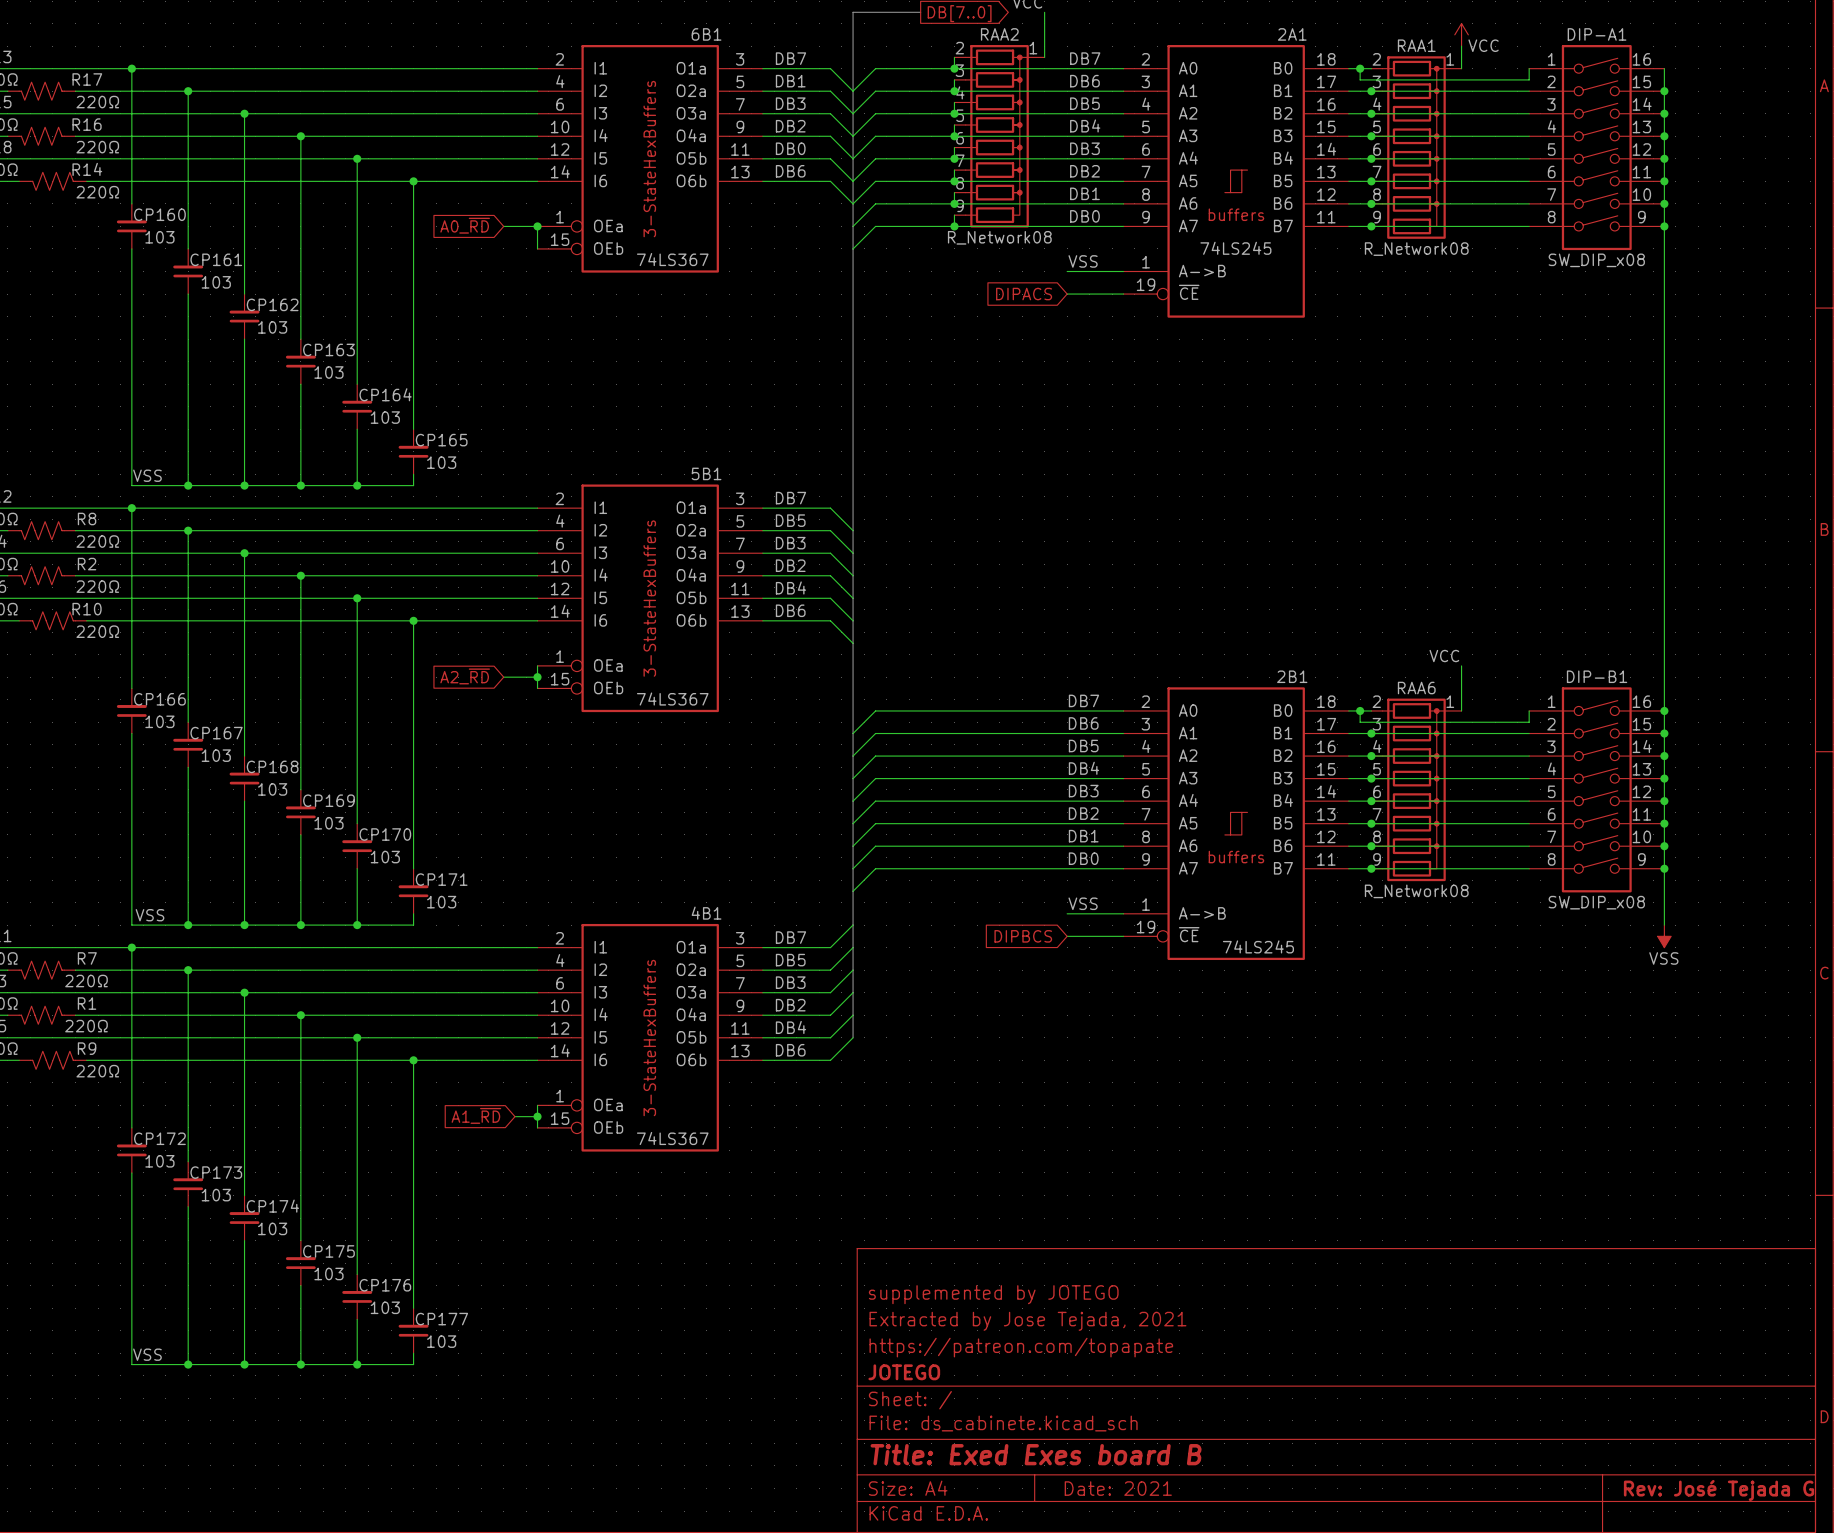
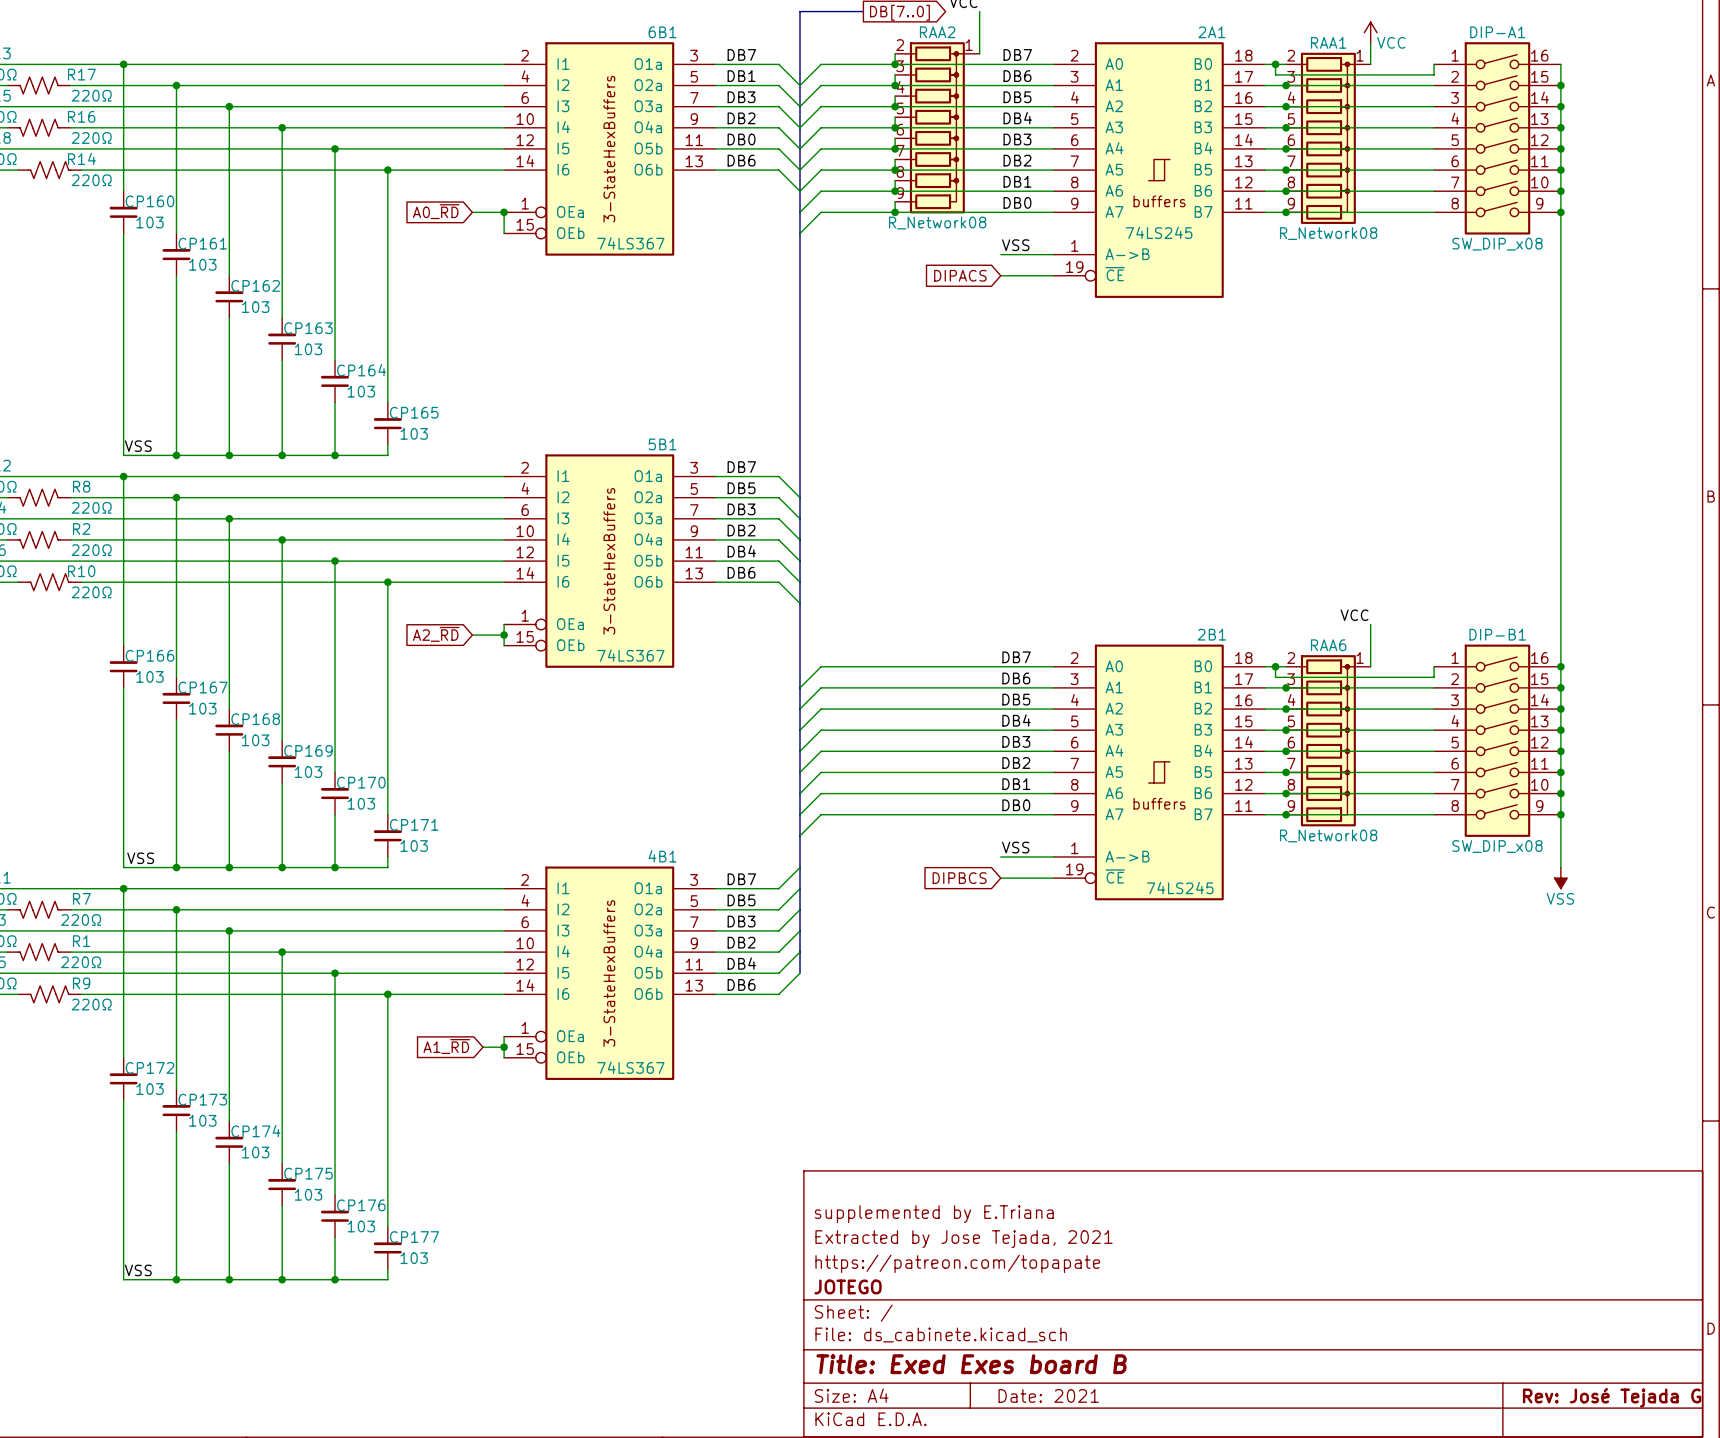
title block: supplemented by JOTEGO (993, 1294) -> supplemented by E.Triana (934, 1214)

